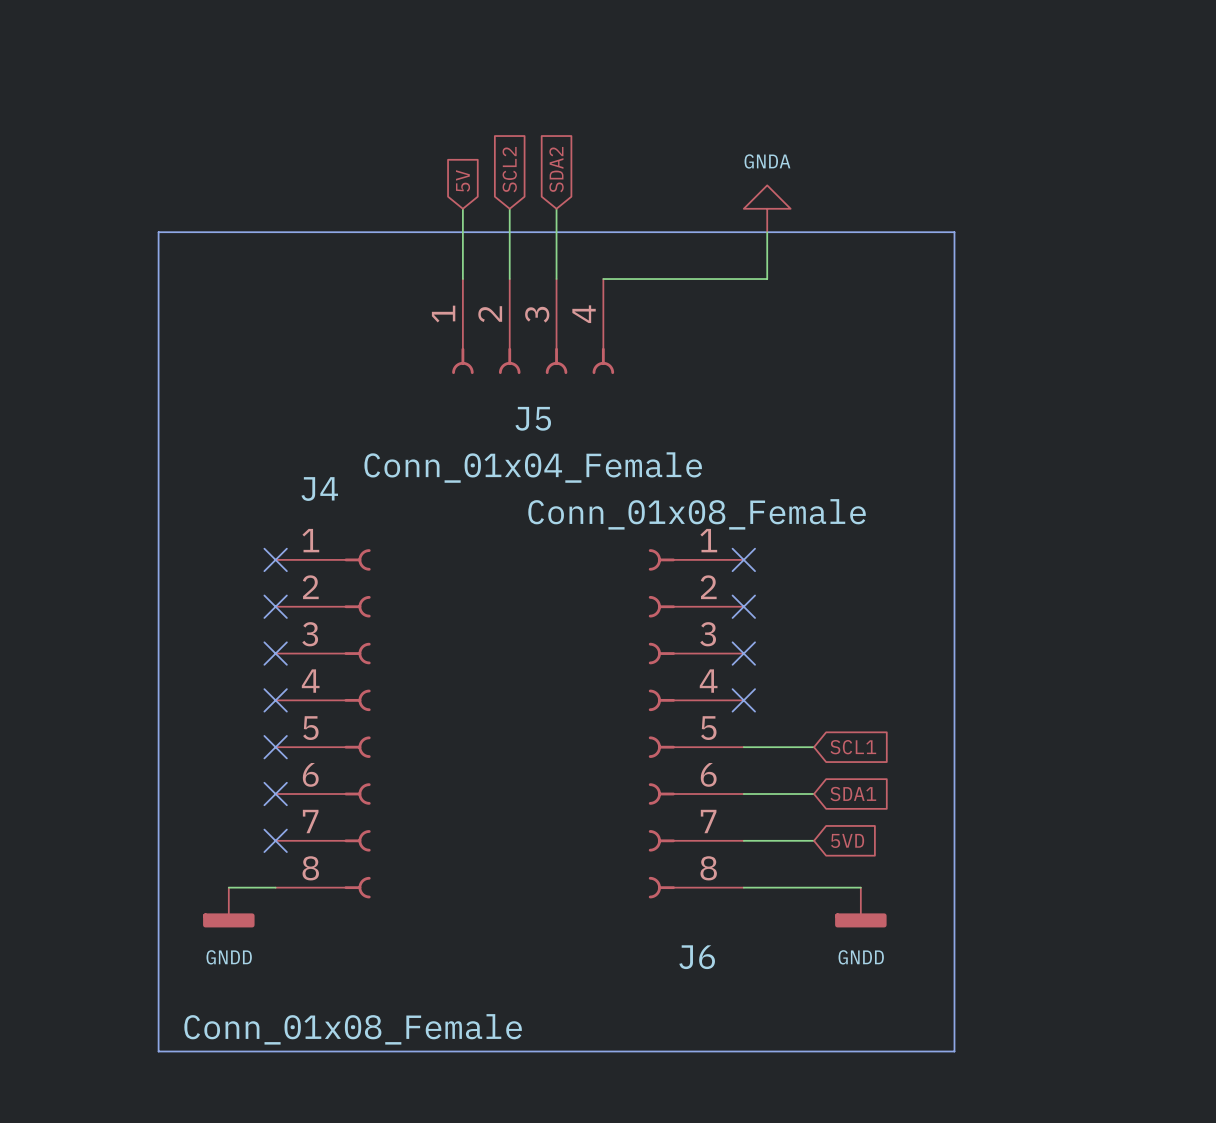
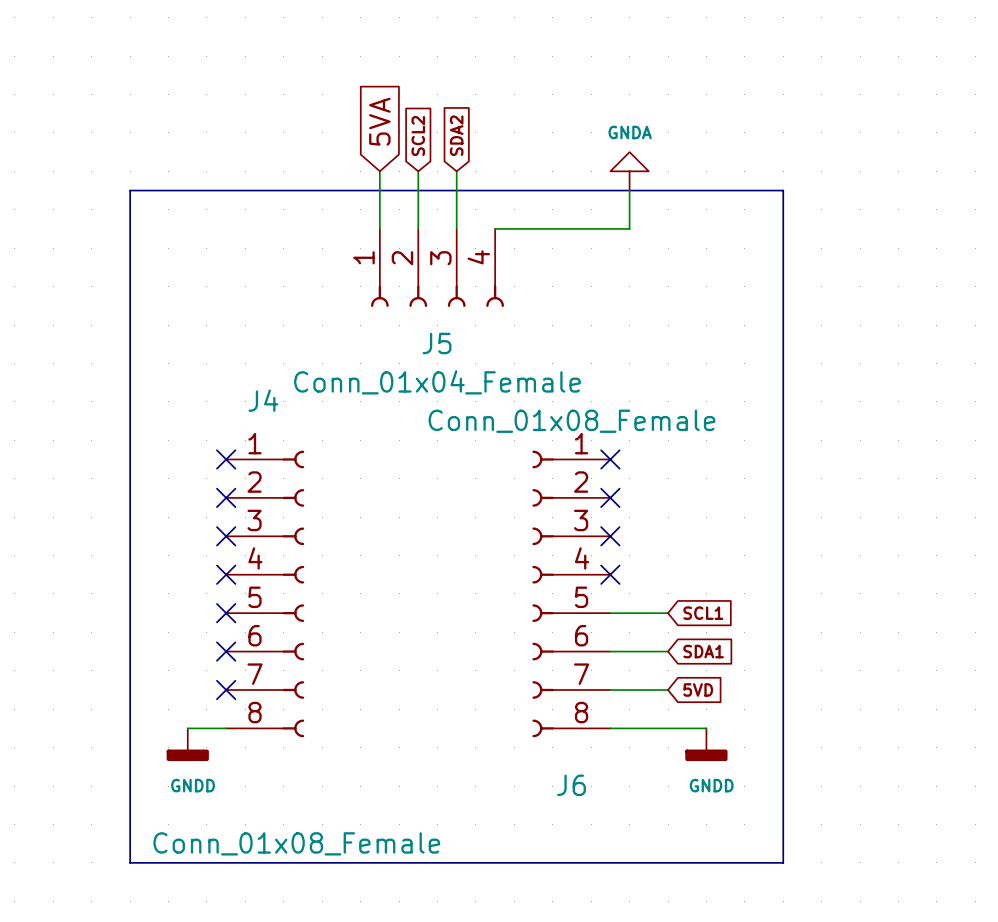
global label: 5V (463, 180) -> 5VA (379, 121)

